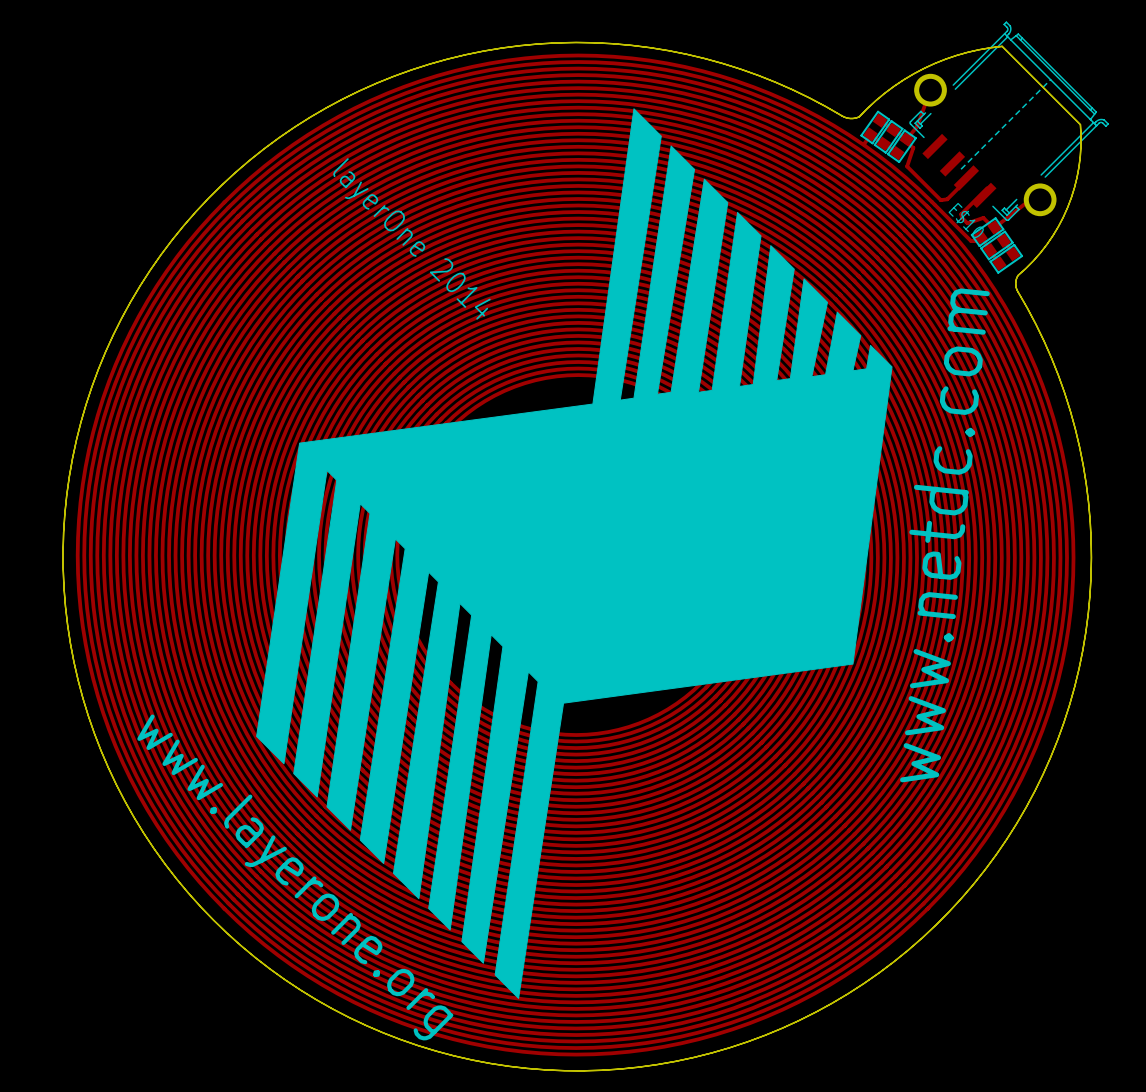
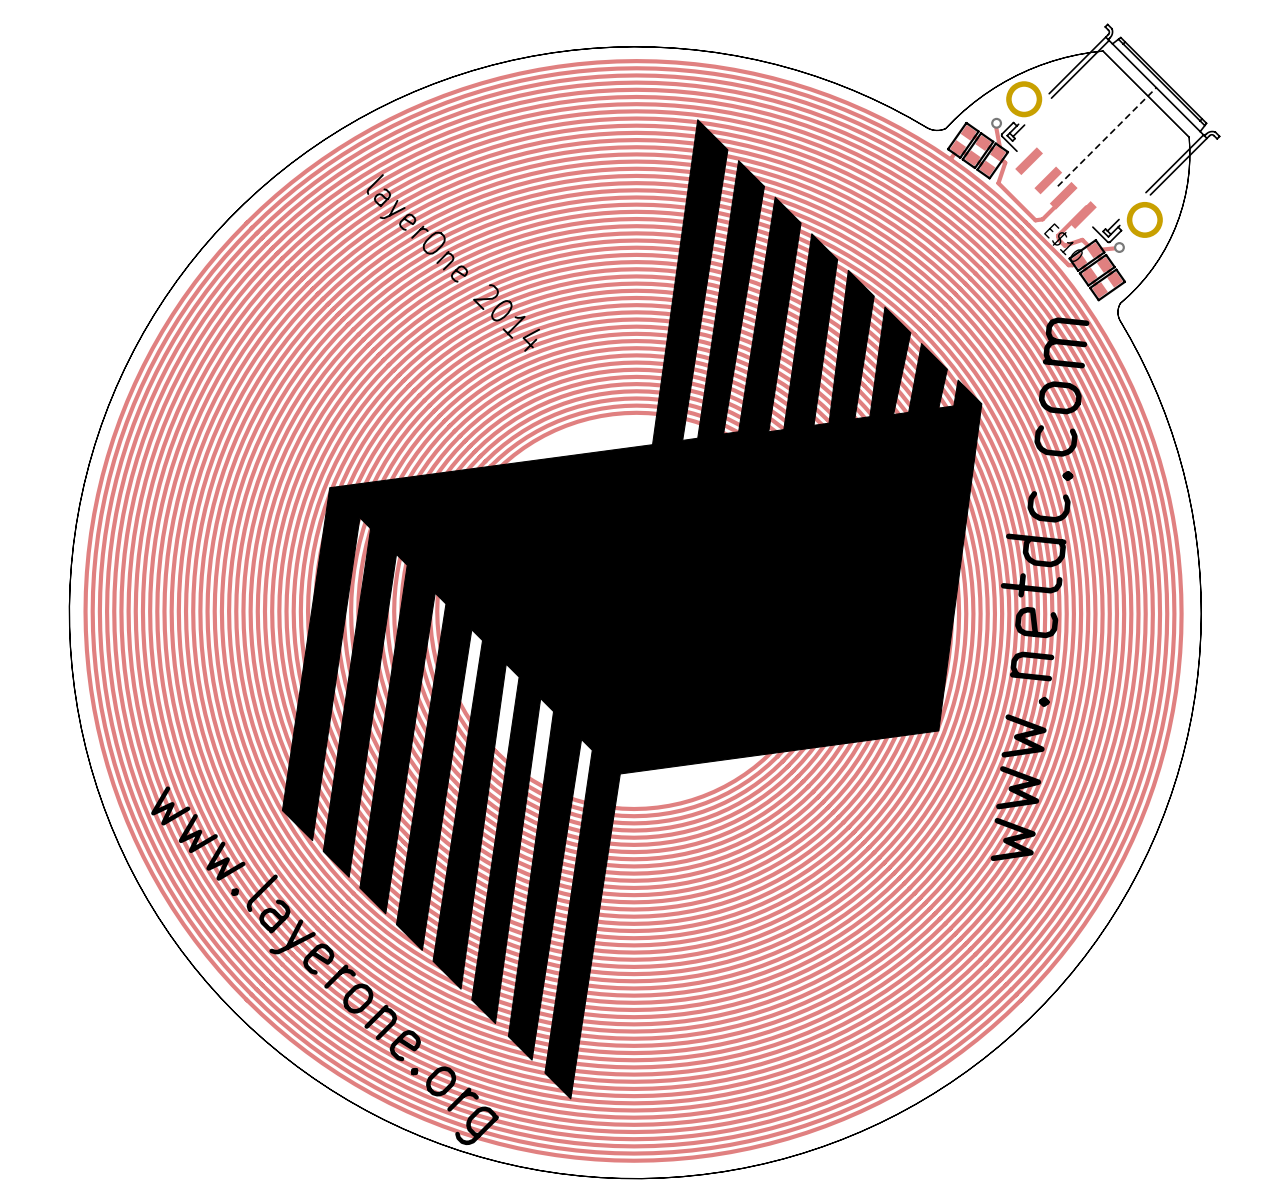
track: (931, 90) (928, 92) (917, 126) (906, 139) -> (996, 124) (999, 147) (998, 153)
via: none -> (996, 123)
track: (1040, 200) (1029, 200) (994, 227) -> (1118, 247) (1095, 250)
via: none -> (1119, 247)

